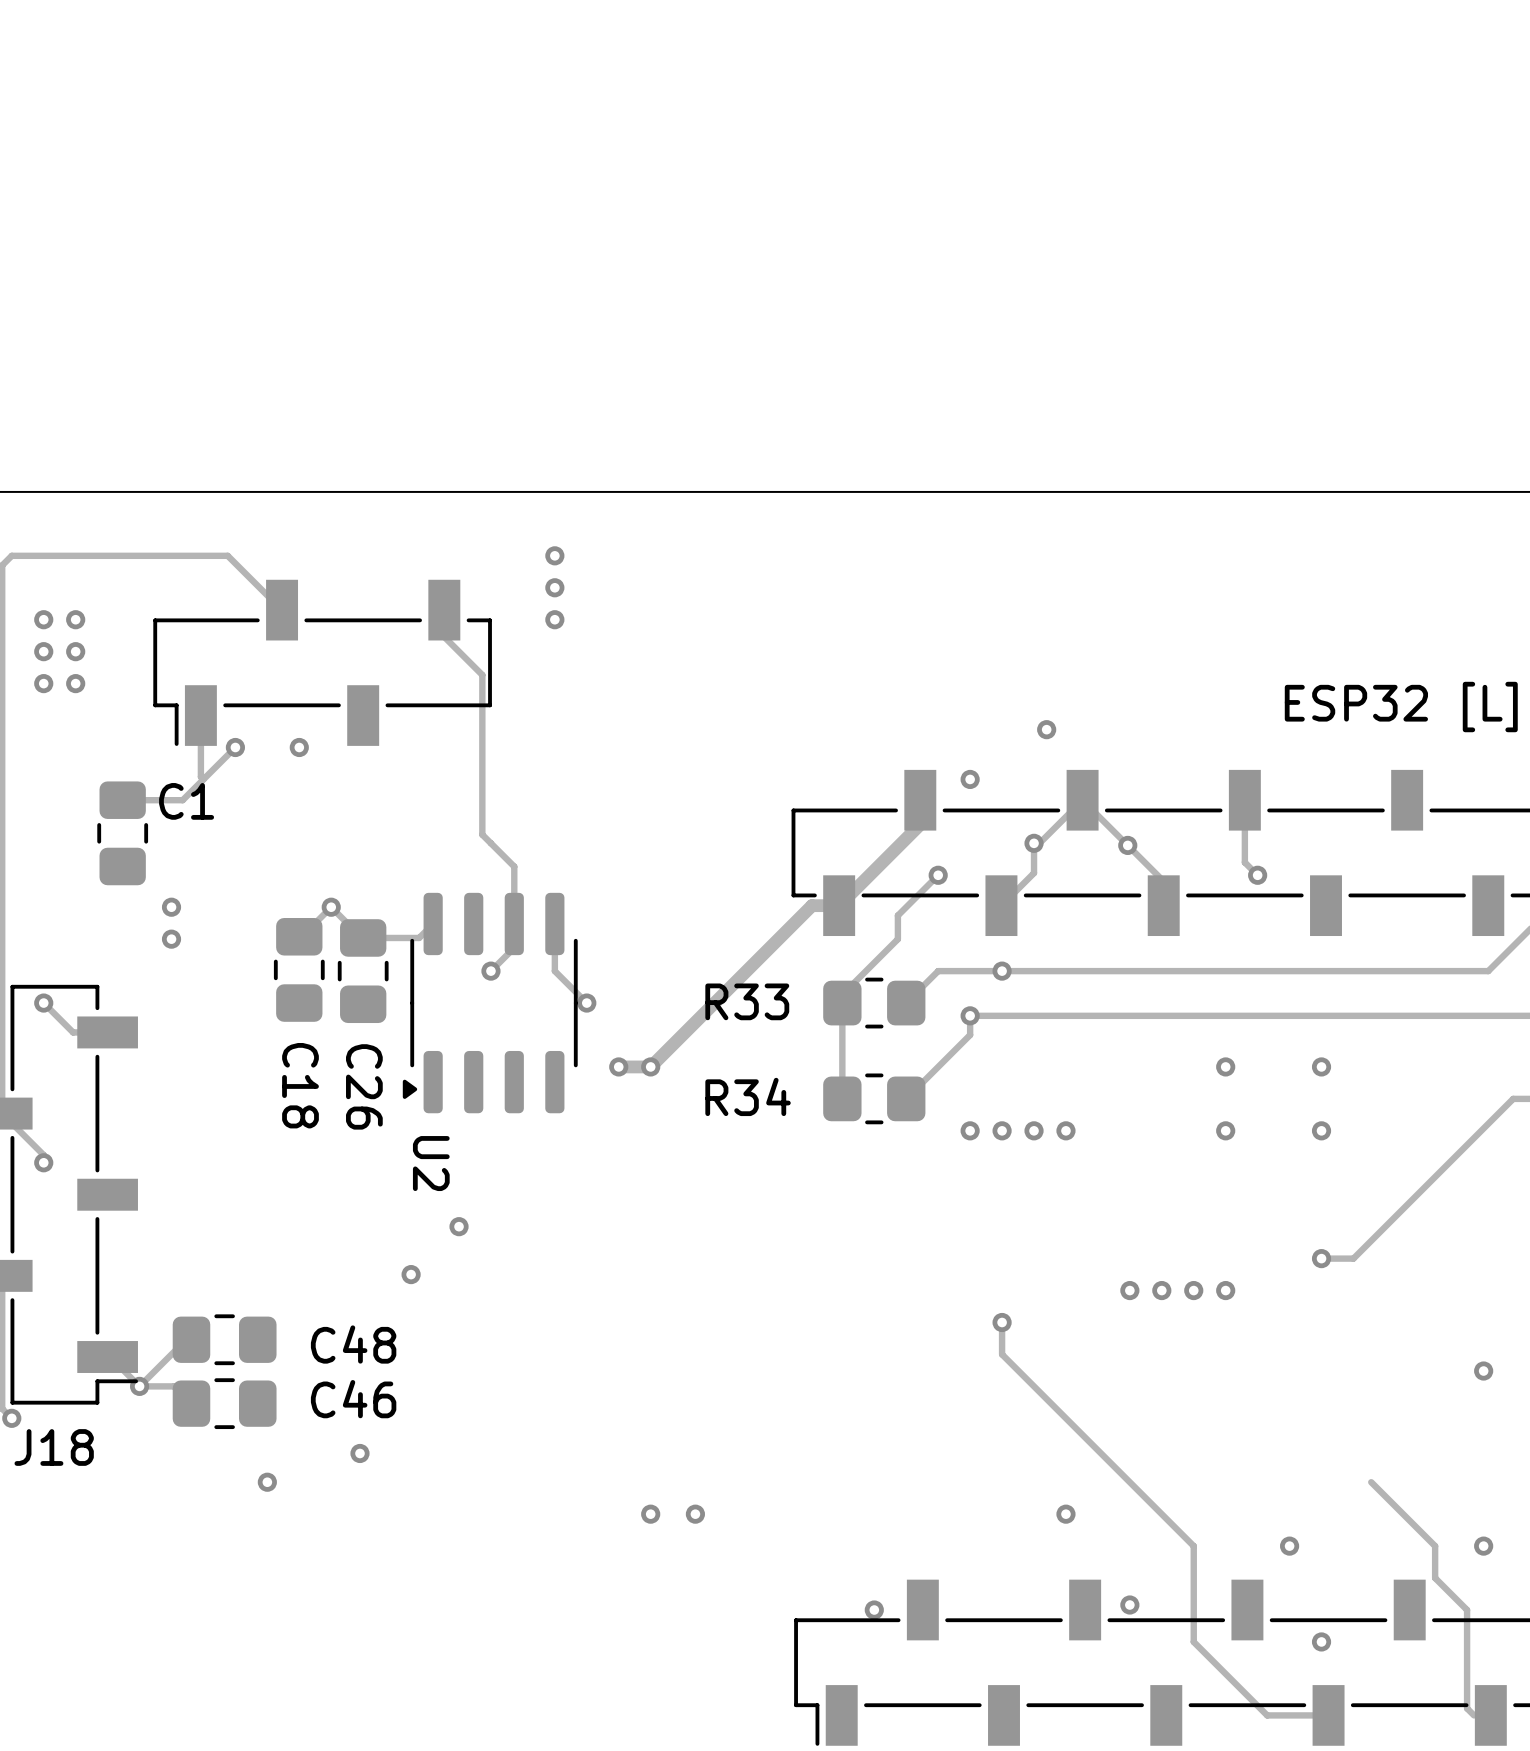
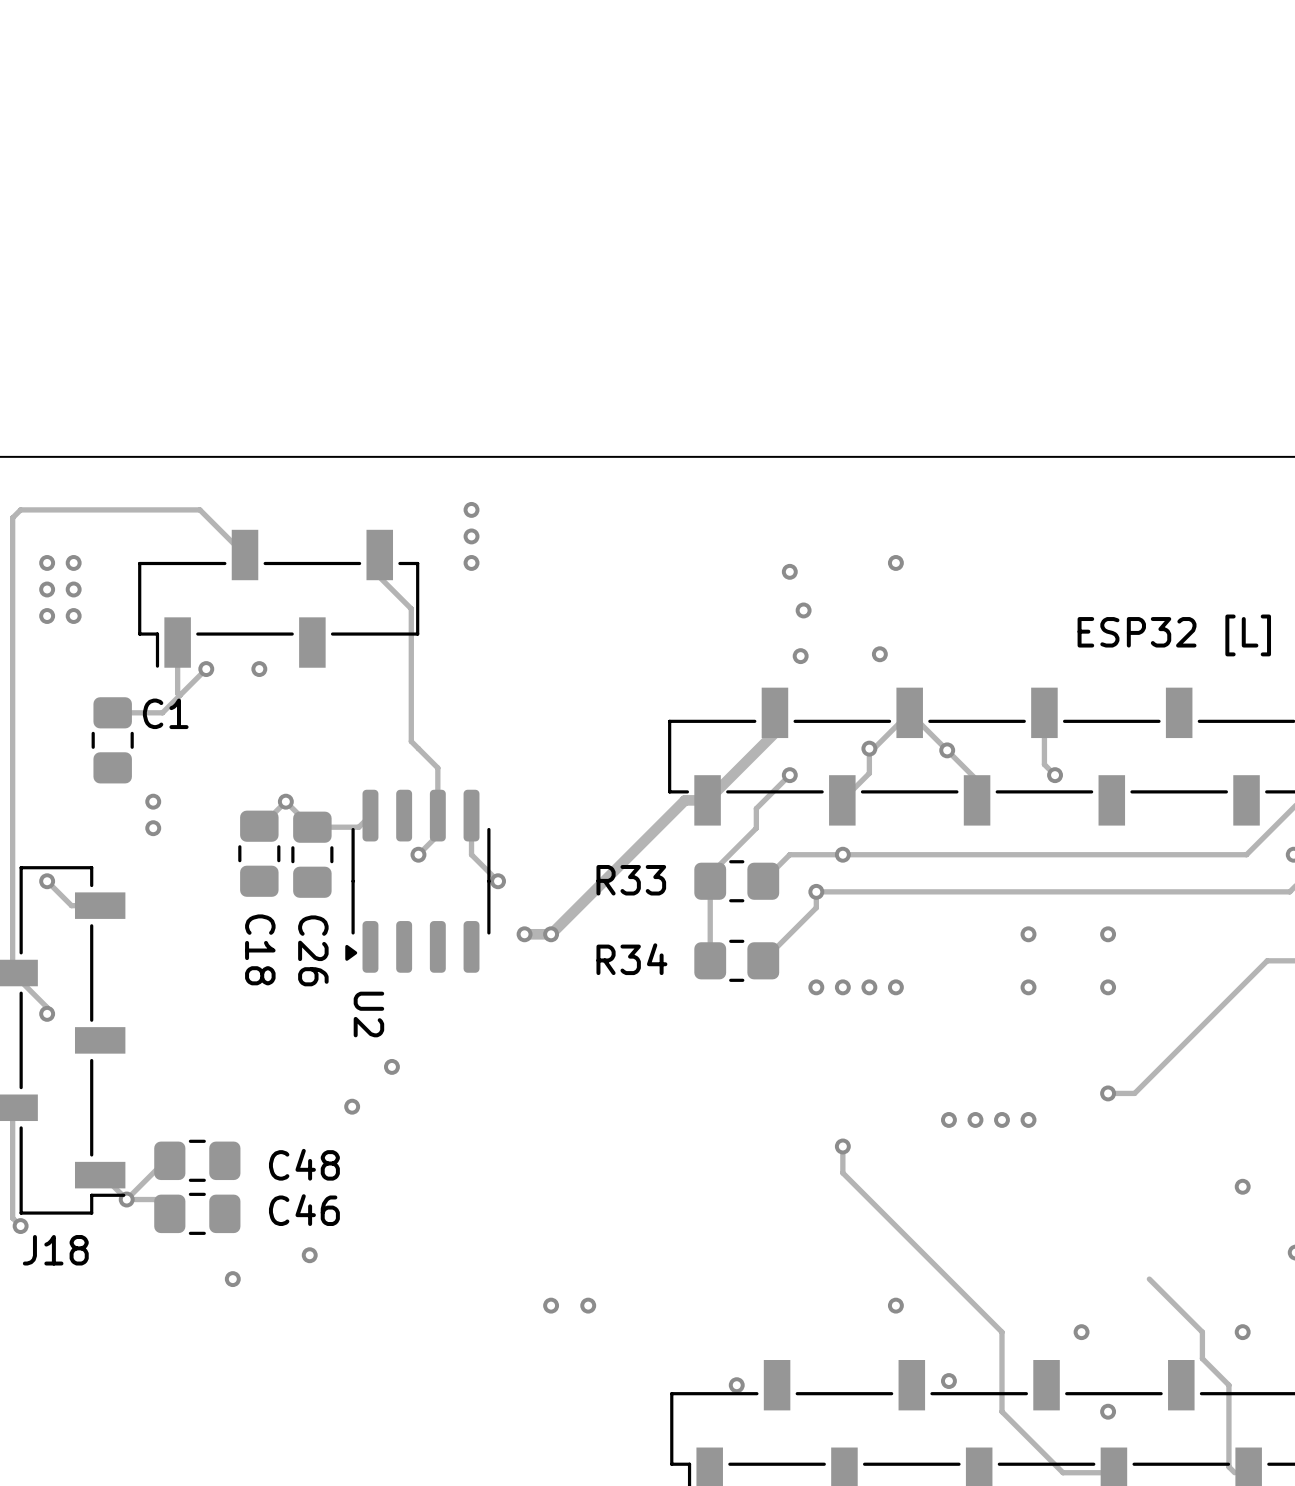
via: none -> (895, 562)
via: none -> (789, 571)
via: none -> (803, 610)
via position: (970, 779) -> (800, 656)

